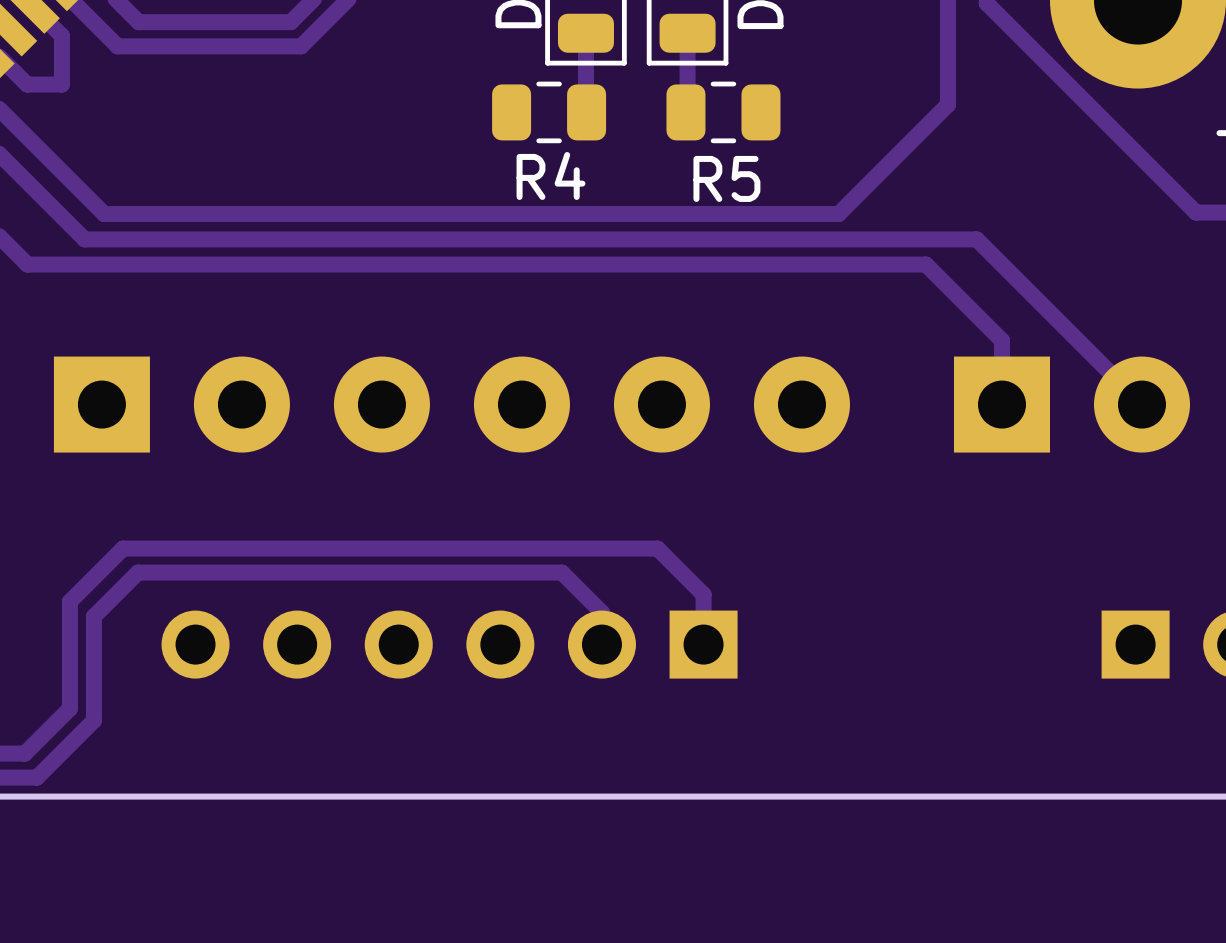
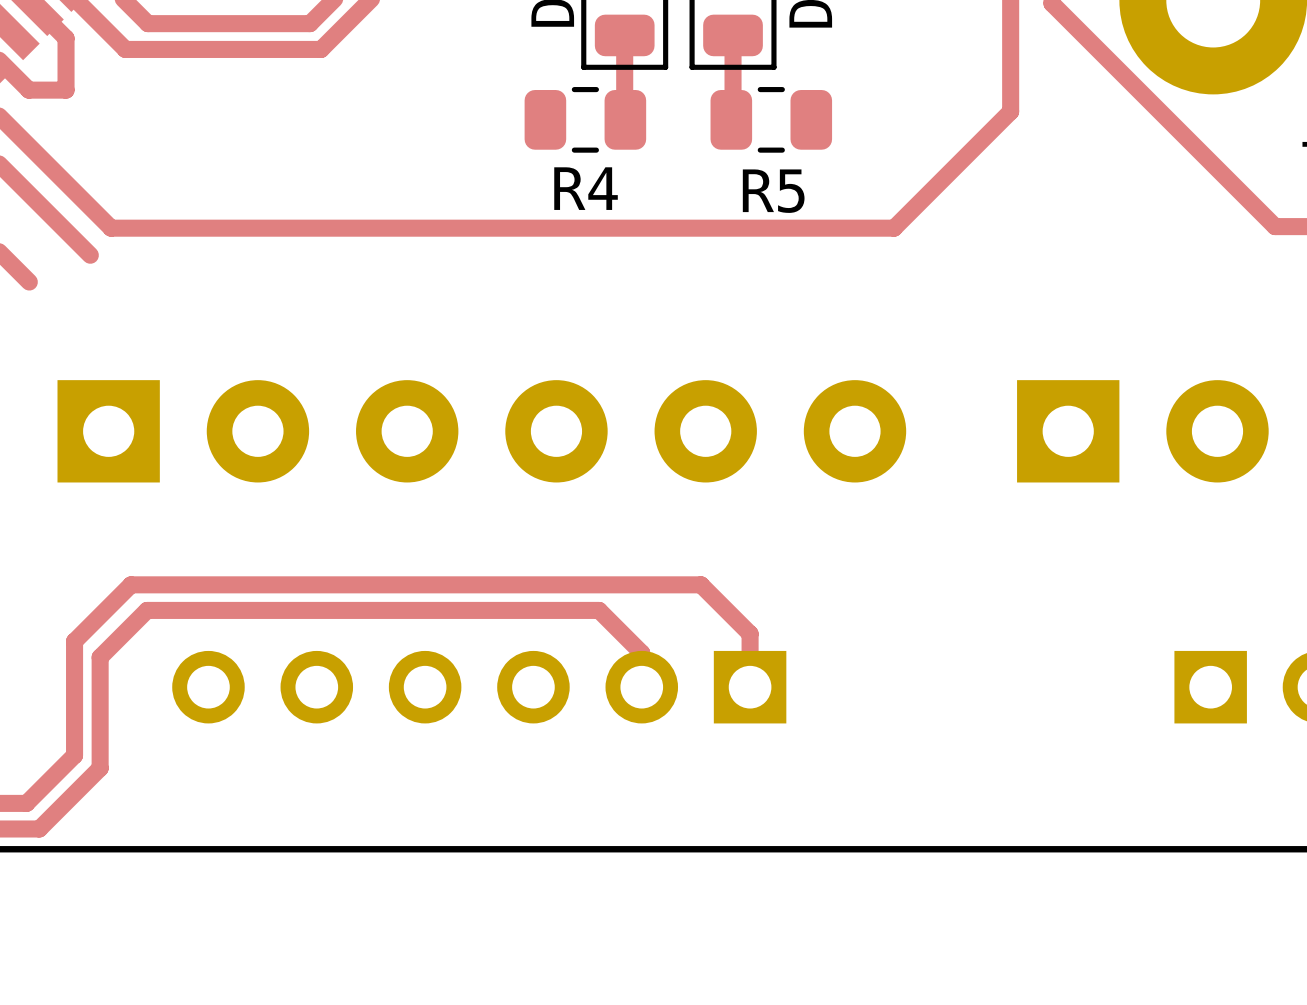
track: (84, 239) (976, 239) (1142, 404) -> none
track: (27, 264) (925, 264) (1001, 340) (1001, 404) -> none

